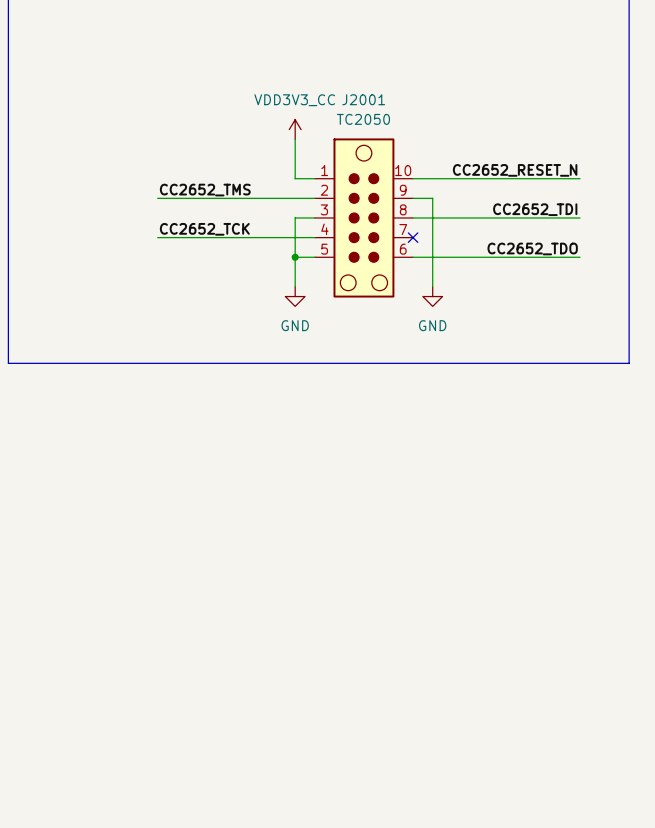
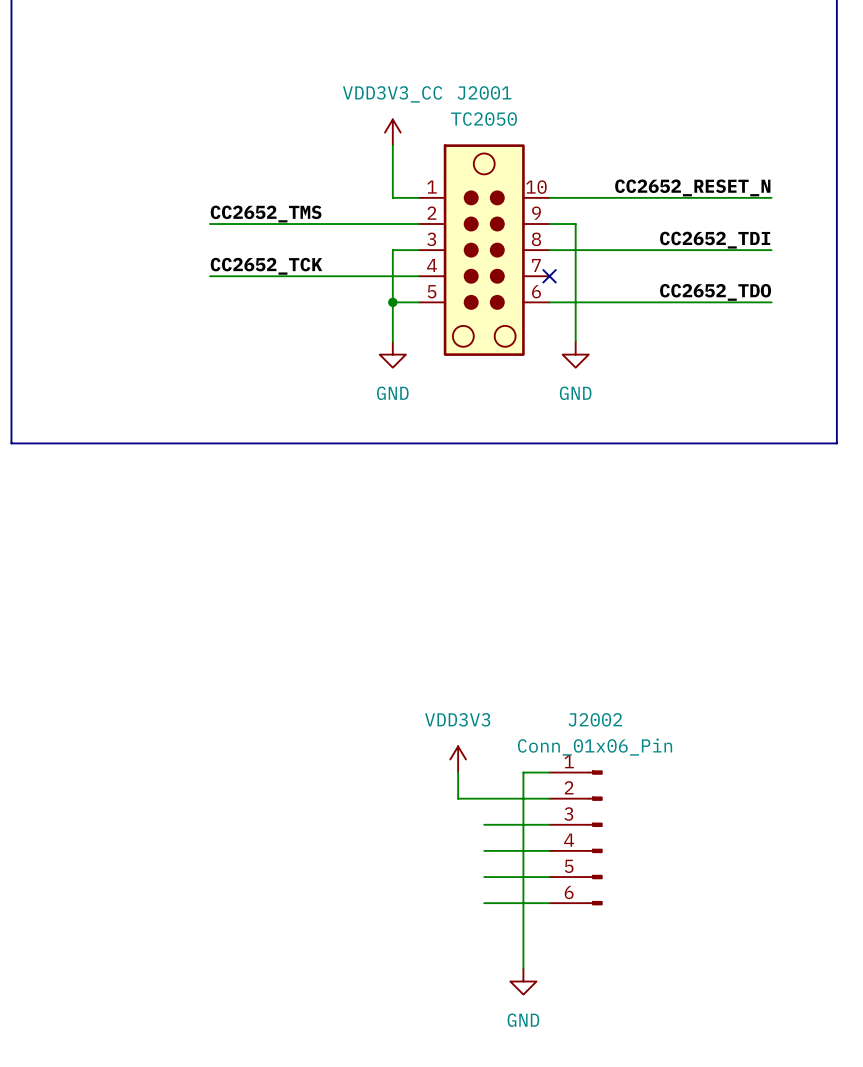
power symbol: none -> VDD3V3 (458, 759)
wire: none -> (458, 772) (458, 798) (549, 798)
wire: none -> (549, 772) (523, 772) (523, 968)
wire: none -> (484, 824) (549, 824)
J2002: none -> Conn_01x06_Pin (576, 837)
wire: none -> (484, 850) (549, 850)
wire: none -> (484, 877) (549, 877)
wire: none -> (484, 903) (549, 903)
power symbol: none -> GND (523, 981)

